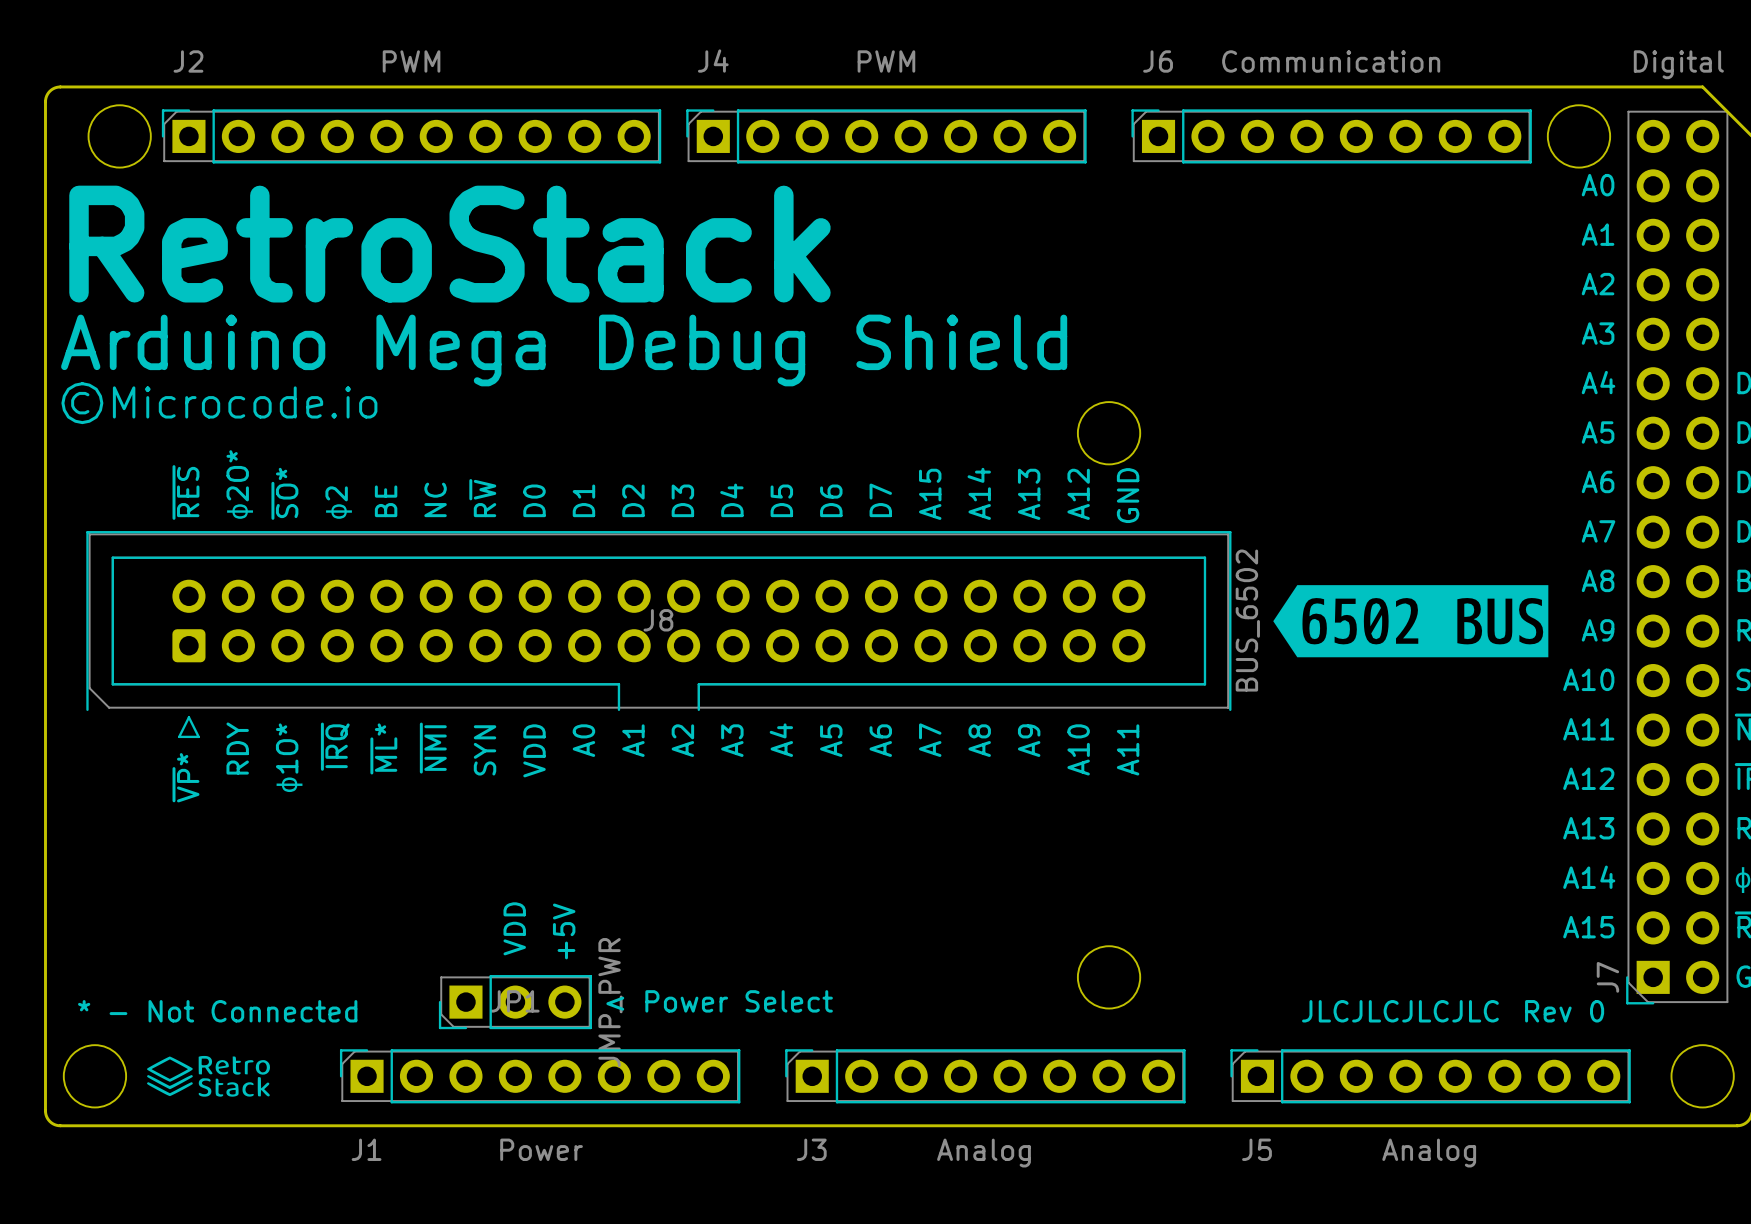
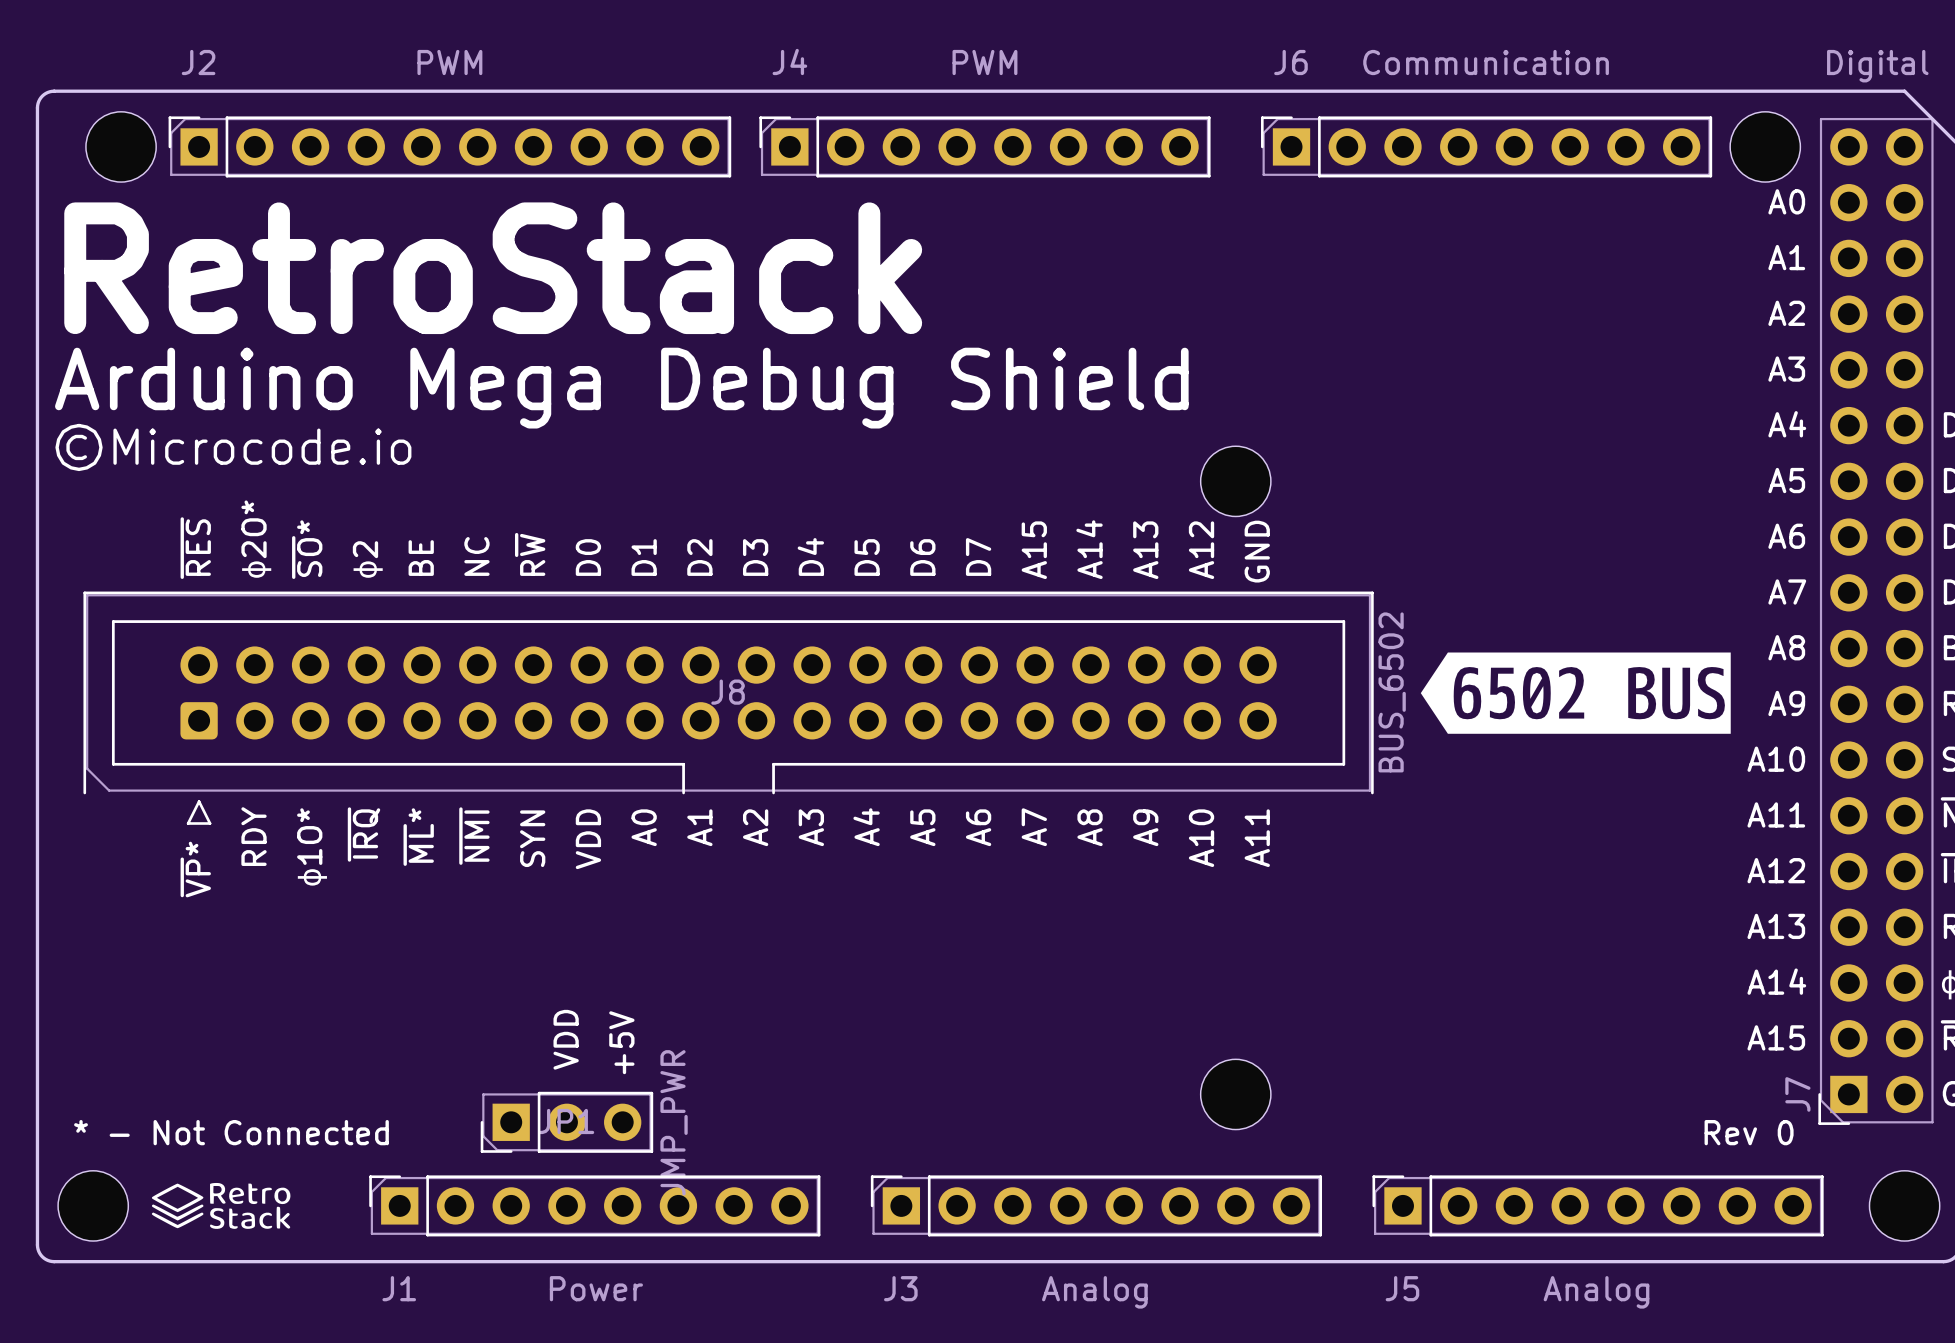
text: < Power Select (719, 1001) -> none
text: JLCJLCJLCJLC (1400, 1011) -> none

